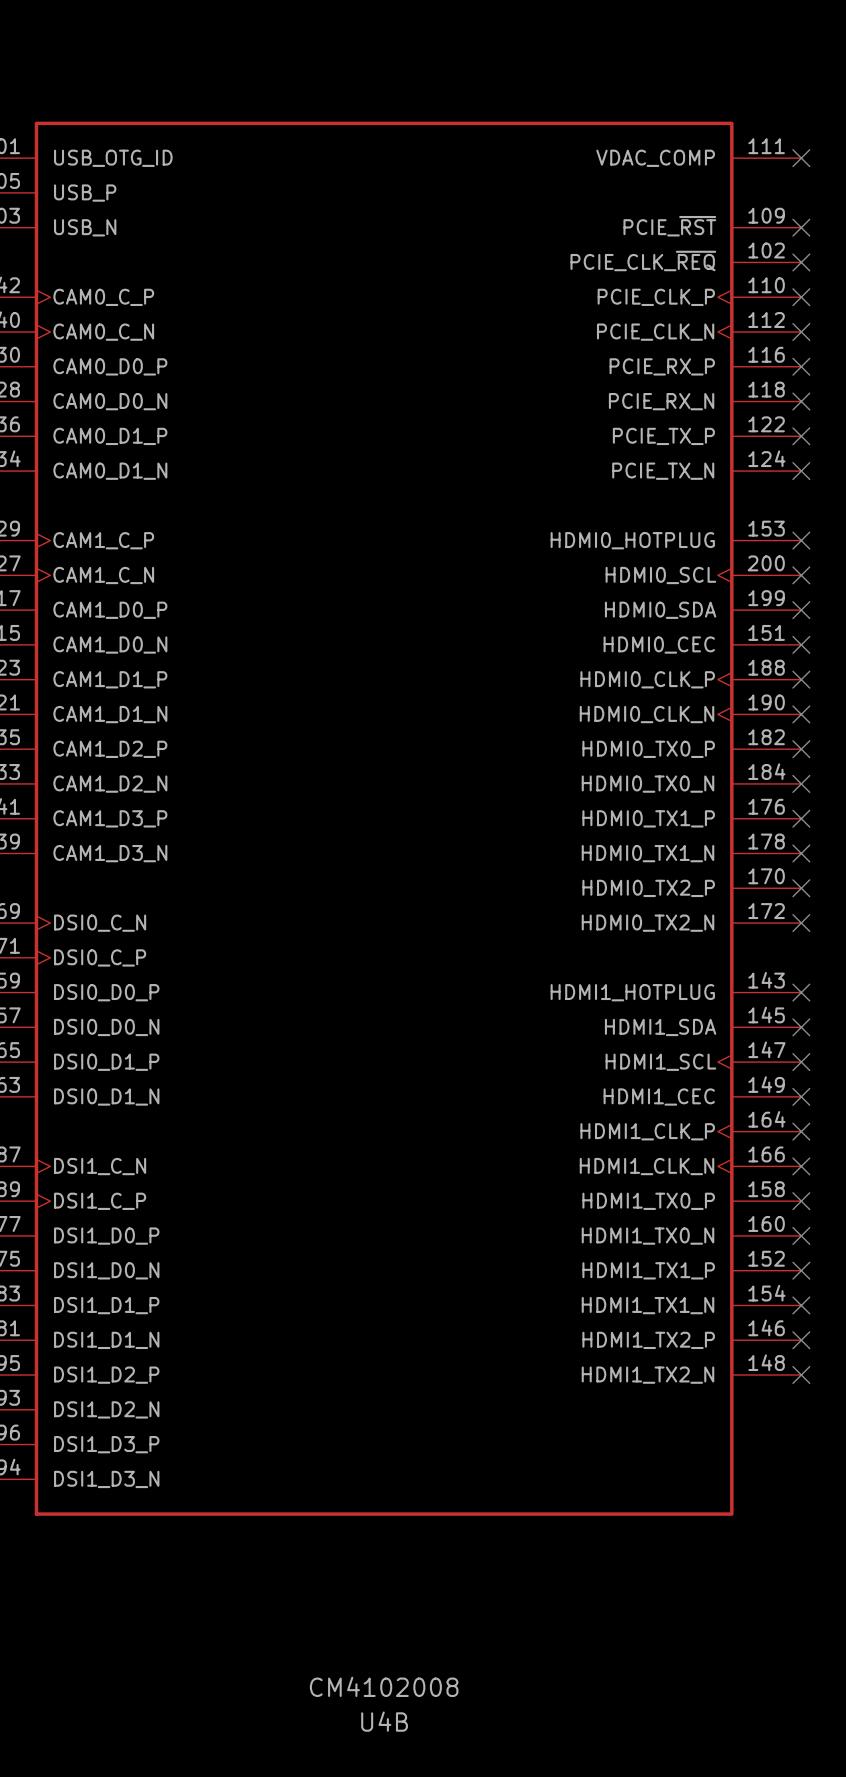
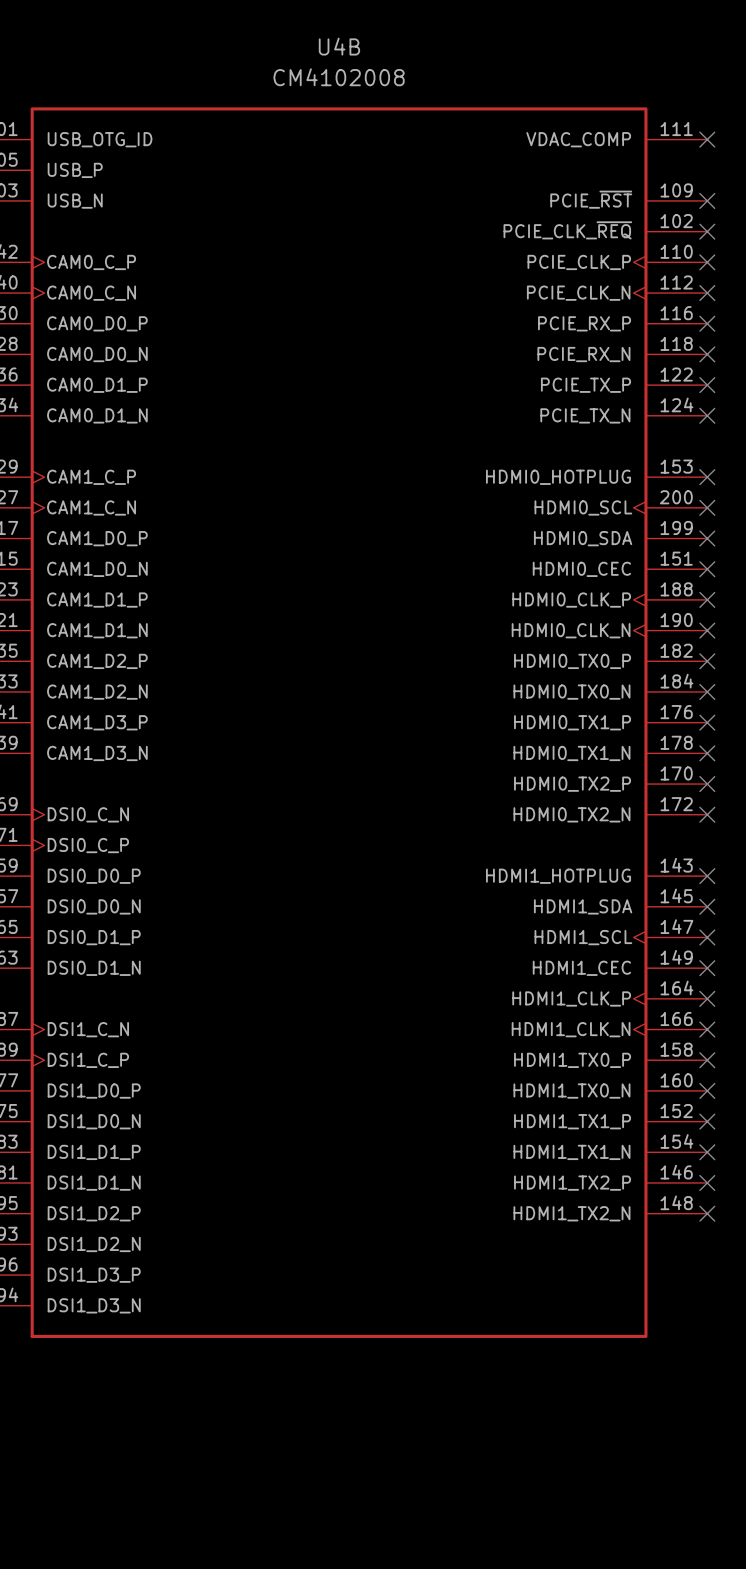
U4B value position: CM4102008 (384, 1686) -> CM4102008 (339, 77)
U4B name position: U4B (384, 1721) -> U4B (339, 46)

